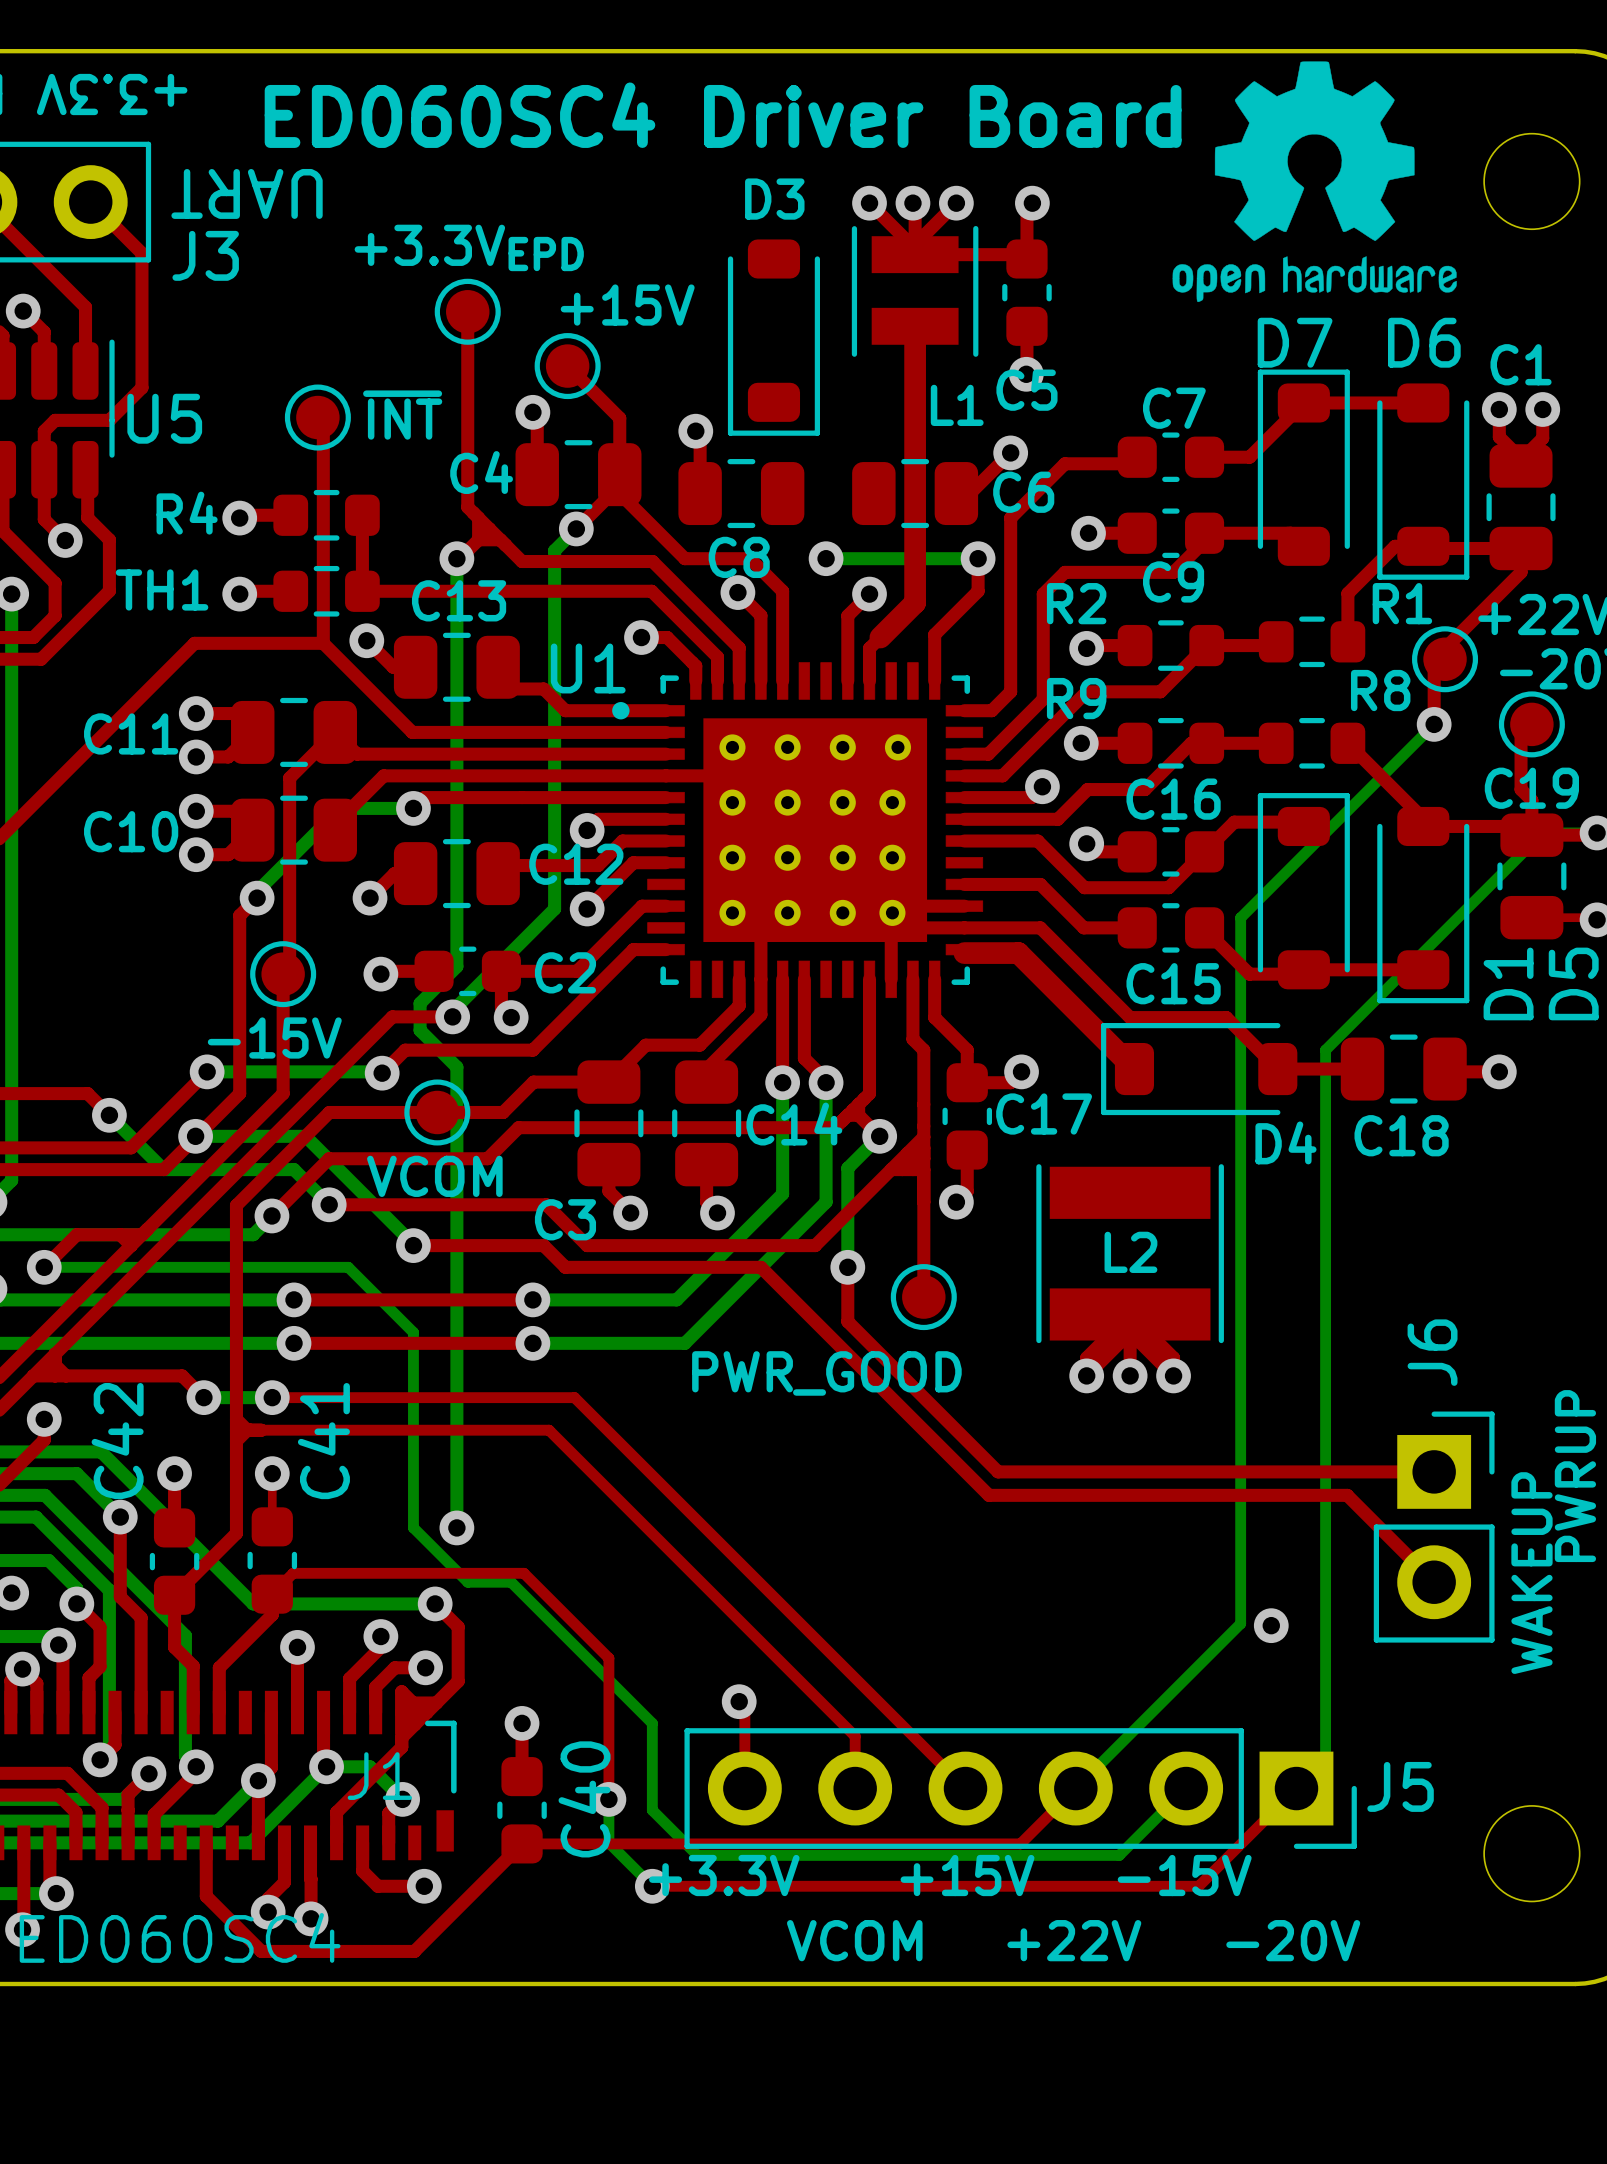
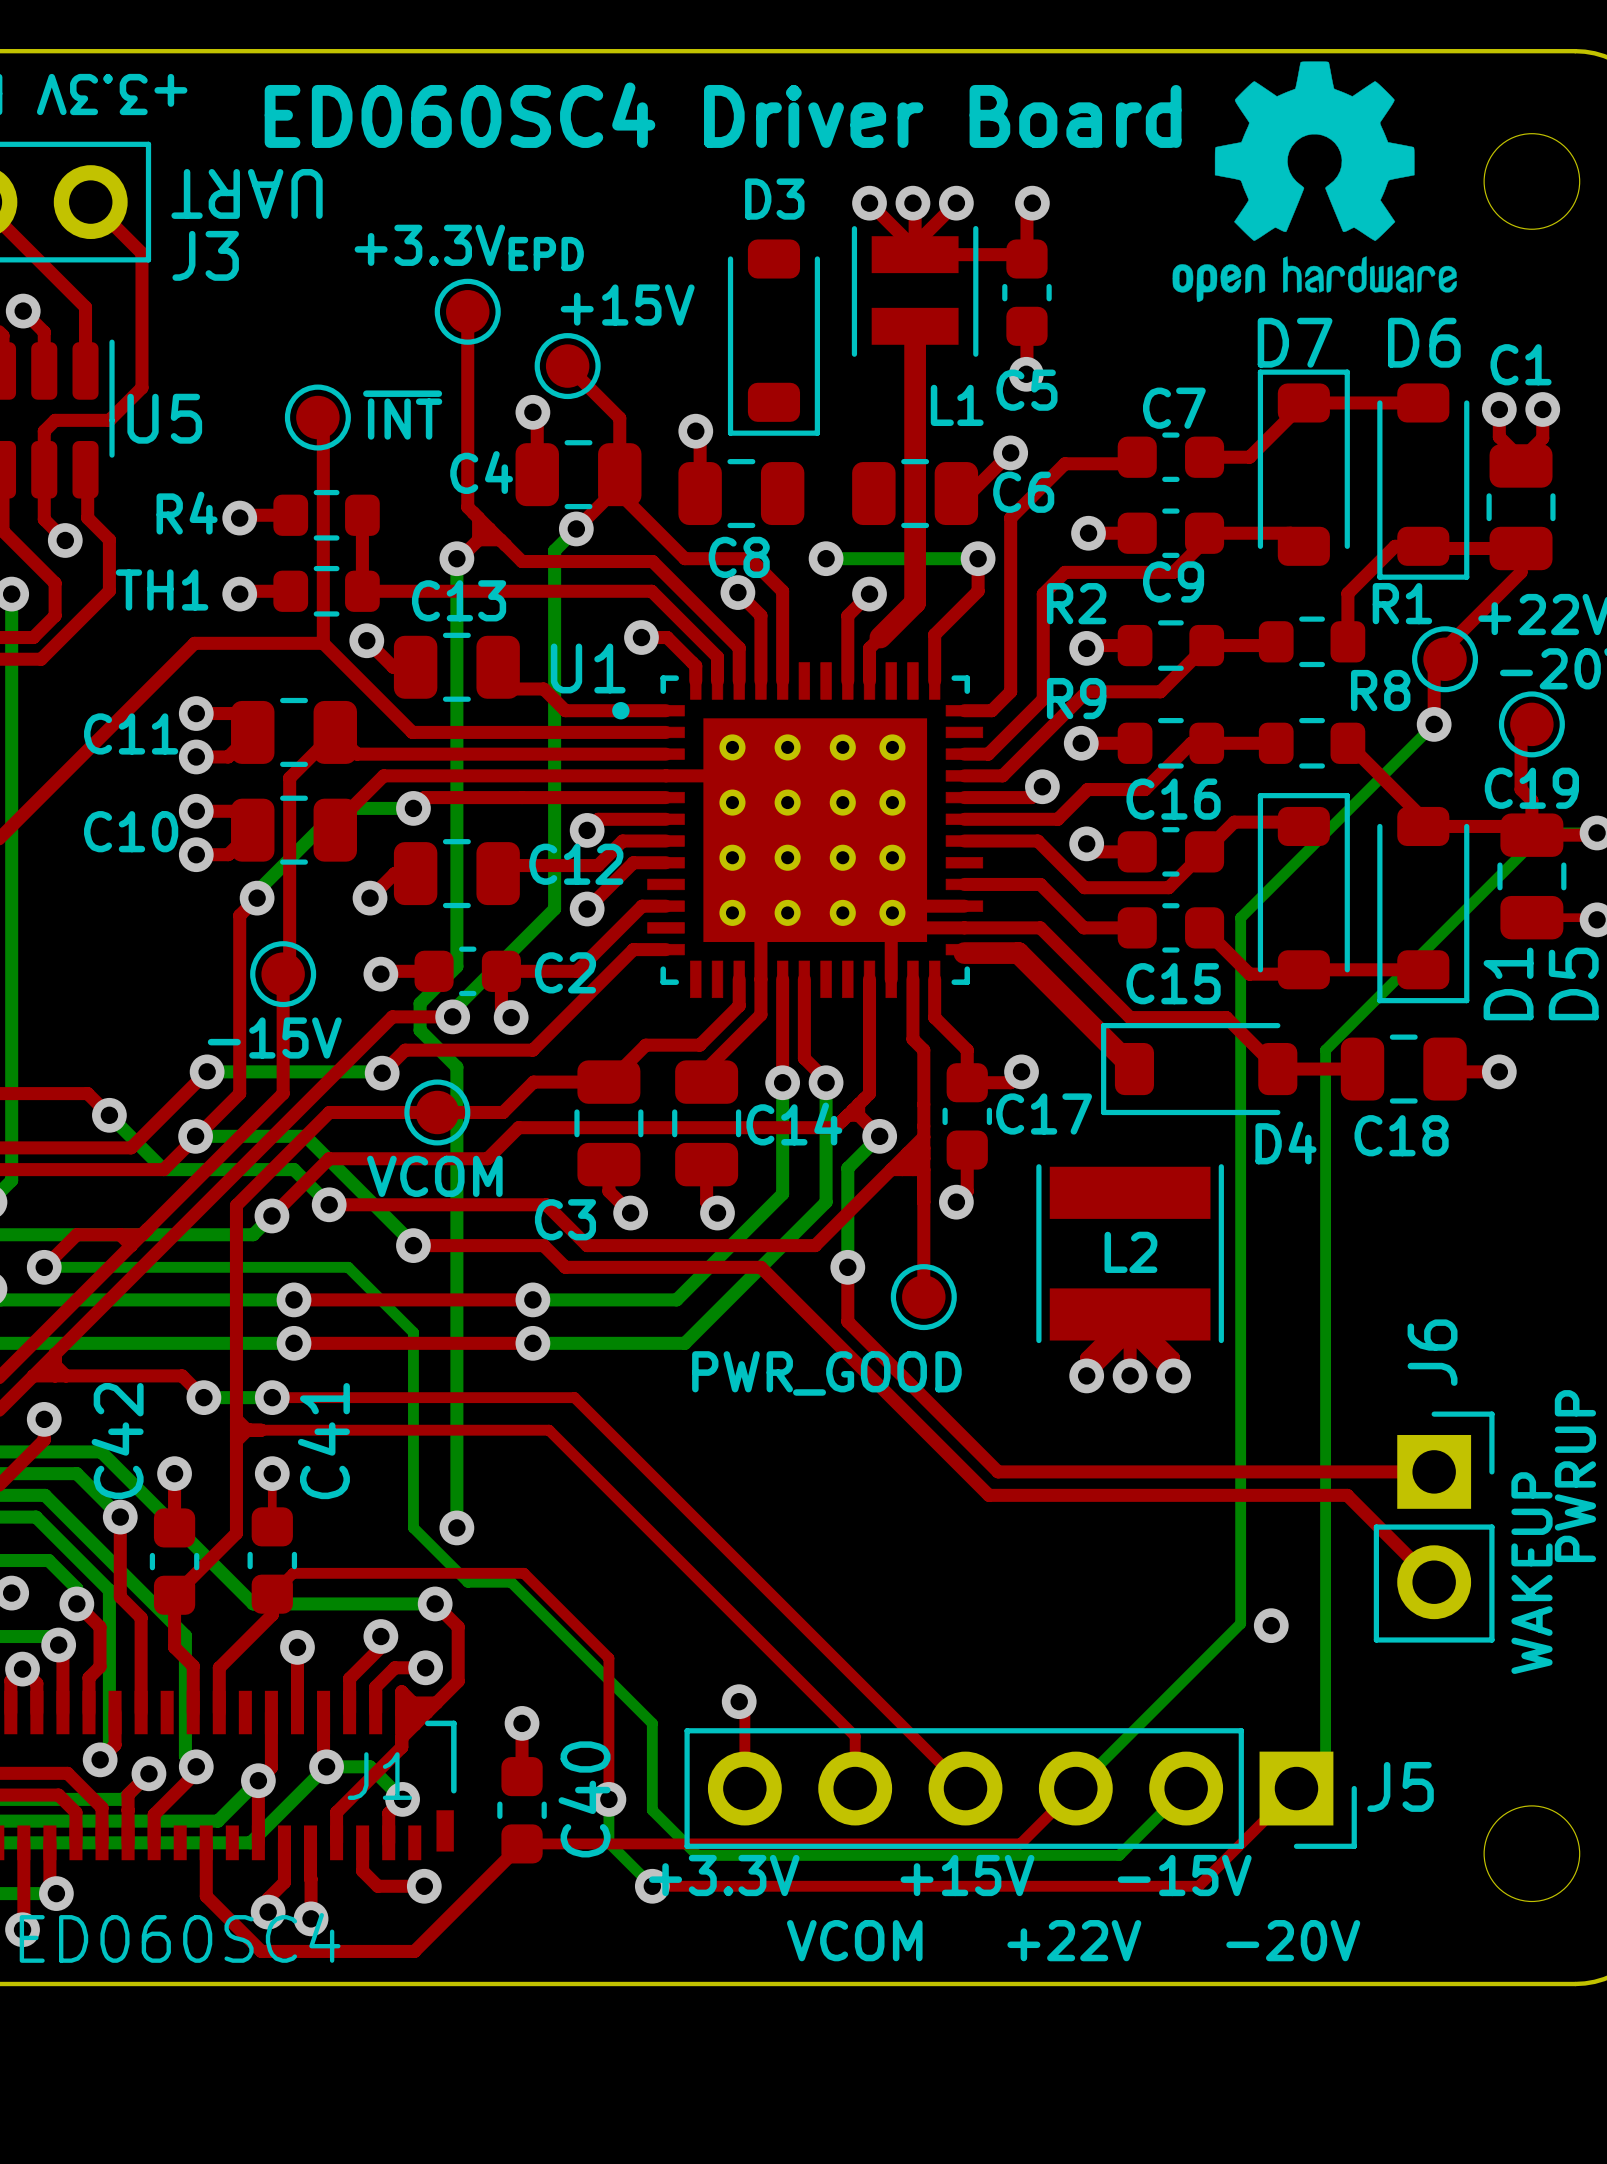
U1 footprint: [612, 662, 984, 999] -> [612, 662, 984, 999]

